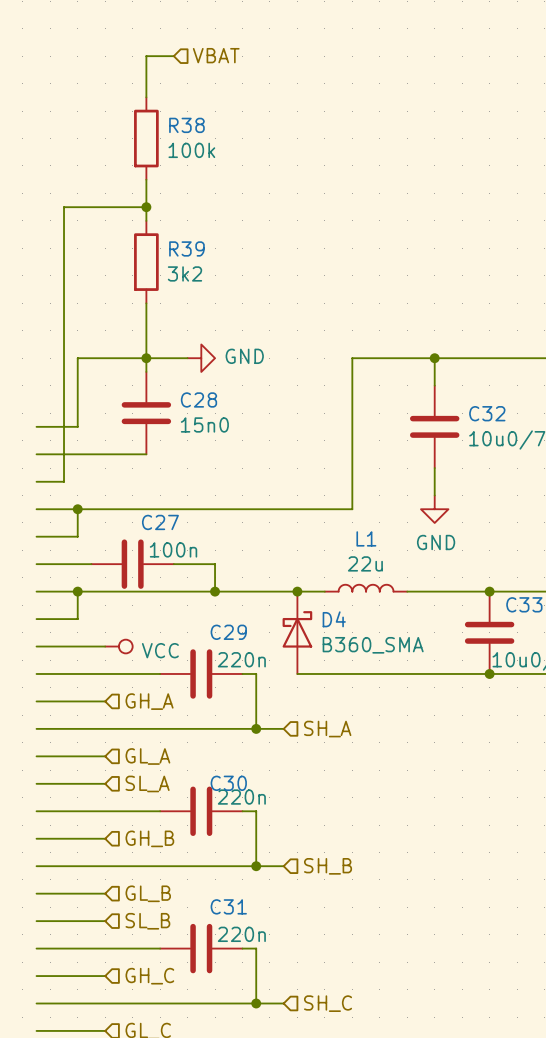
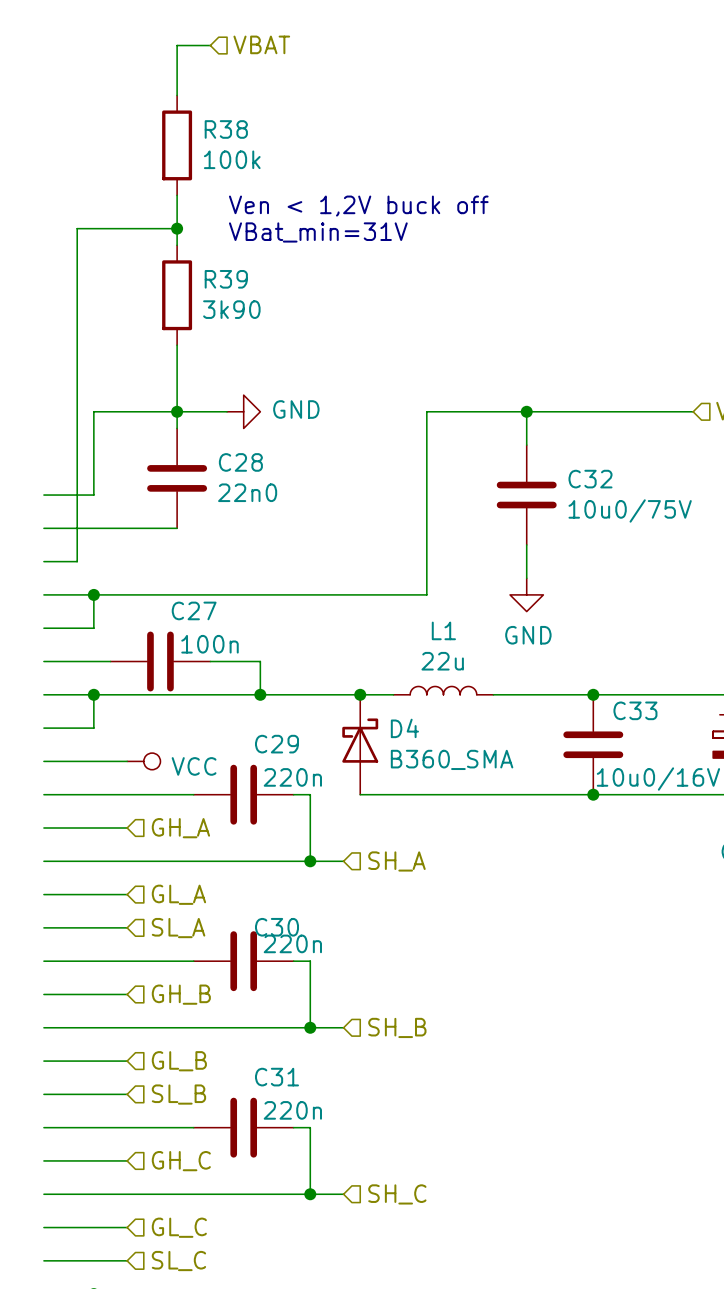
text: none -> Ven < 1,2V buck off (358, 206)
text: none -> VBat_min=31V (318, 232)
R39 value: 3k2 (184, 273) -> 3k90 (231, 309)
C28 value: 15n0 (204, 424) -> 22n0 (247, 492)

